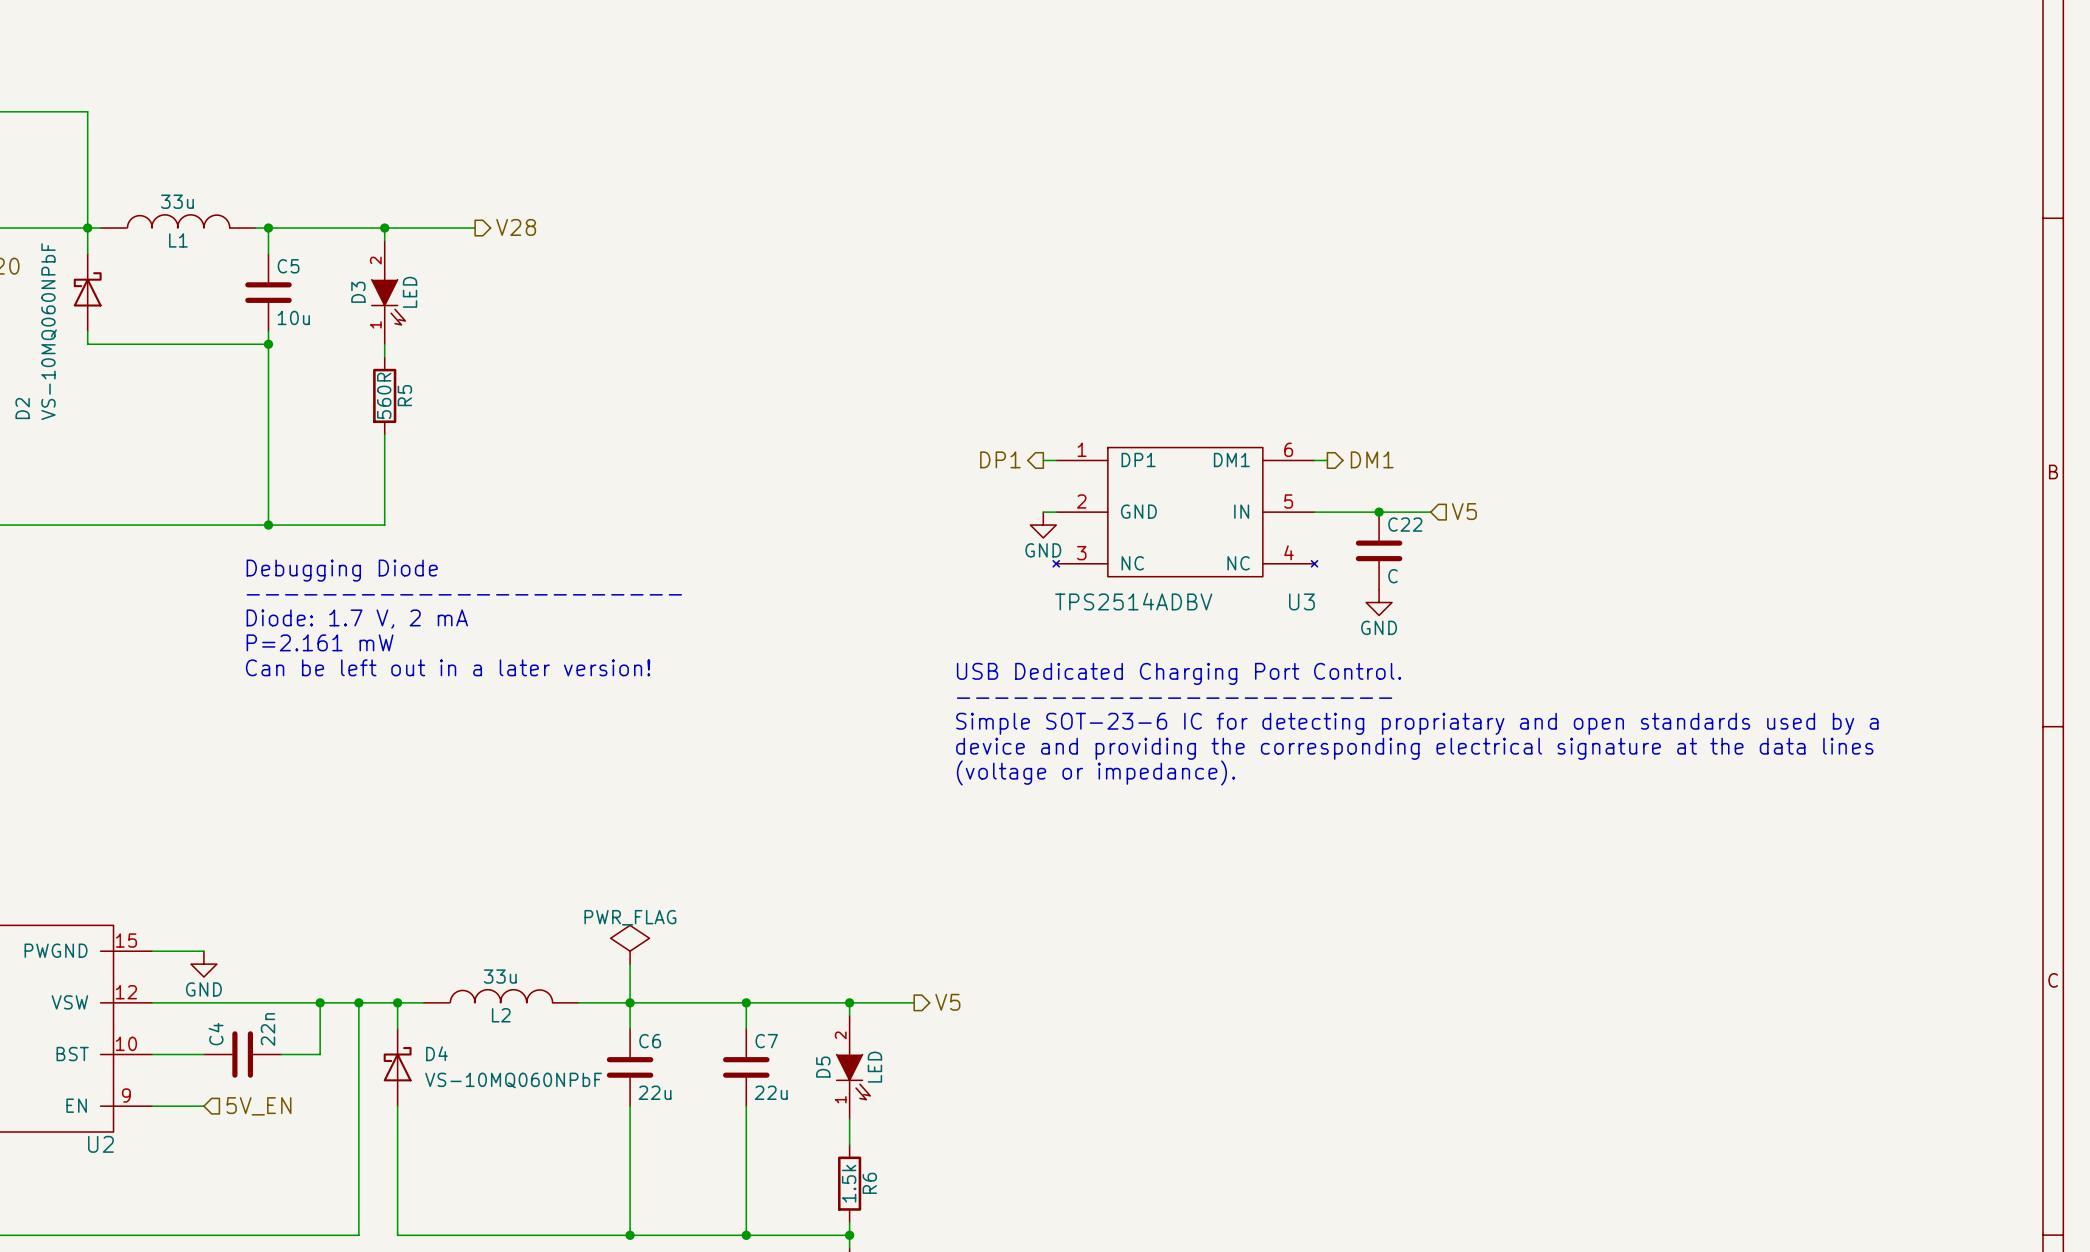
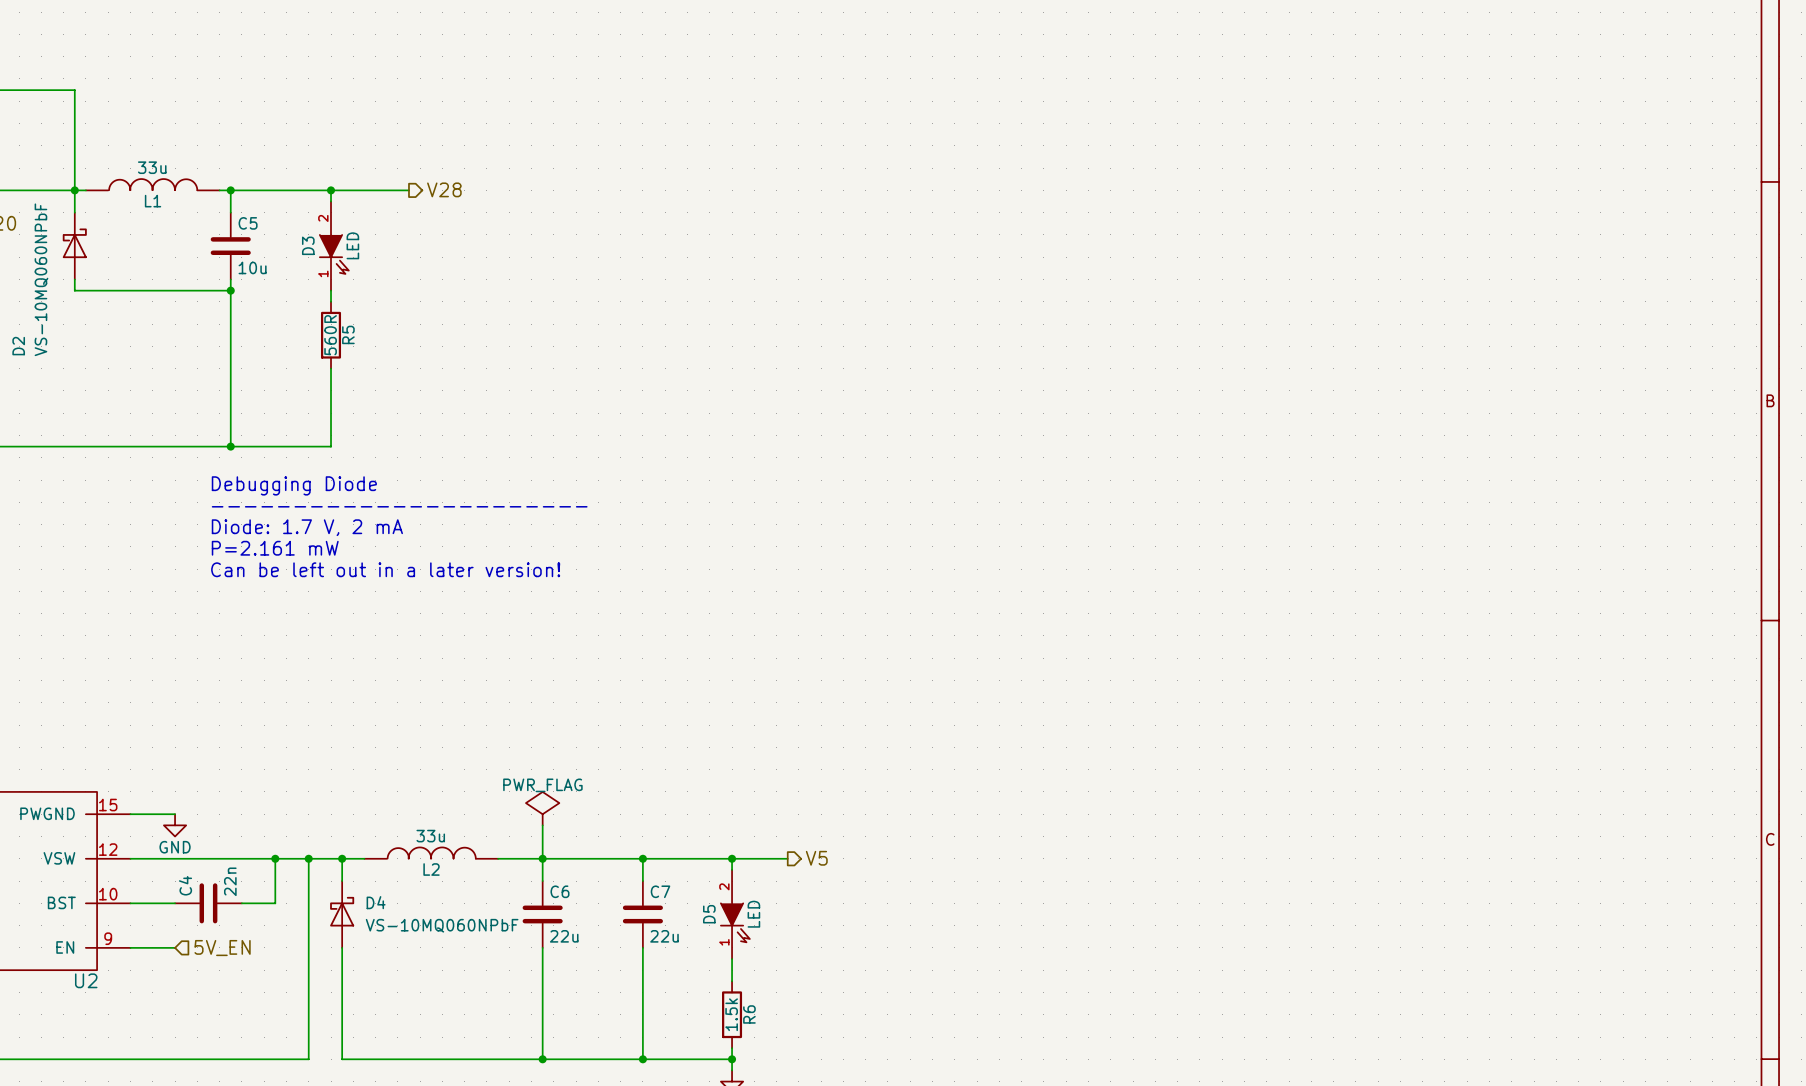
hierarchical label: DP1 (1000, 459) -> none
hierarchical label: DM1 (1372, 459) -> none
wire: (1043, 460) (1056, 460) -> none
wire: (1314, 460) (1327, 460) -> none
hierarchical label: V5 (1464, 511) -> none
wire: (1043, 512) (1056, 512) -> none
U3: TPS2514ADBV (1185, 512) -> none
wire: (1314, 512) (1430, 512) -> none
junction: (1379, 512) -> none
power symbol: GND (1043, 525) -> none
C22: C (1379, 550) -> none
power symbol: GND (1379, 602) -> none
text: USB Dedicated Charging Port Control. (1179, 673) -> none
text: ----------------------- (1174, 698) -> none
text: Simple SOT-23-6 IC for detecting propriatary and open standards used by a (1417, 723) -> none
text: device and providing the corresponding electrical signature at the data lines (1414, 748) -> none
text: (voltage or impedance). (1095, 772) -> none

